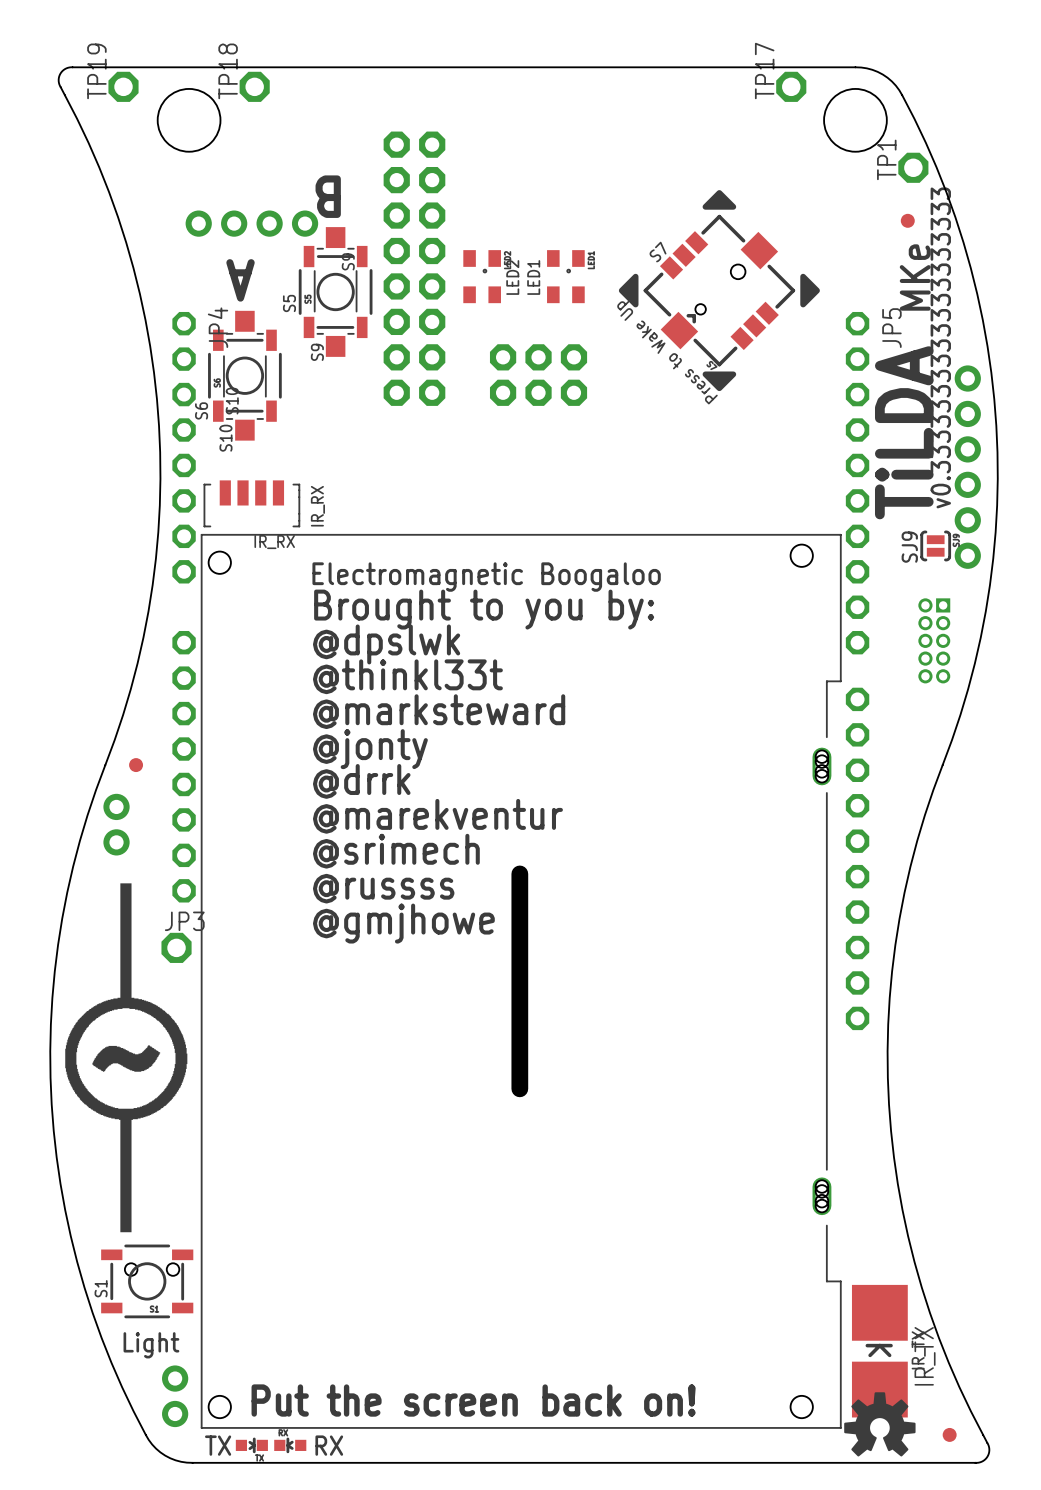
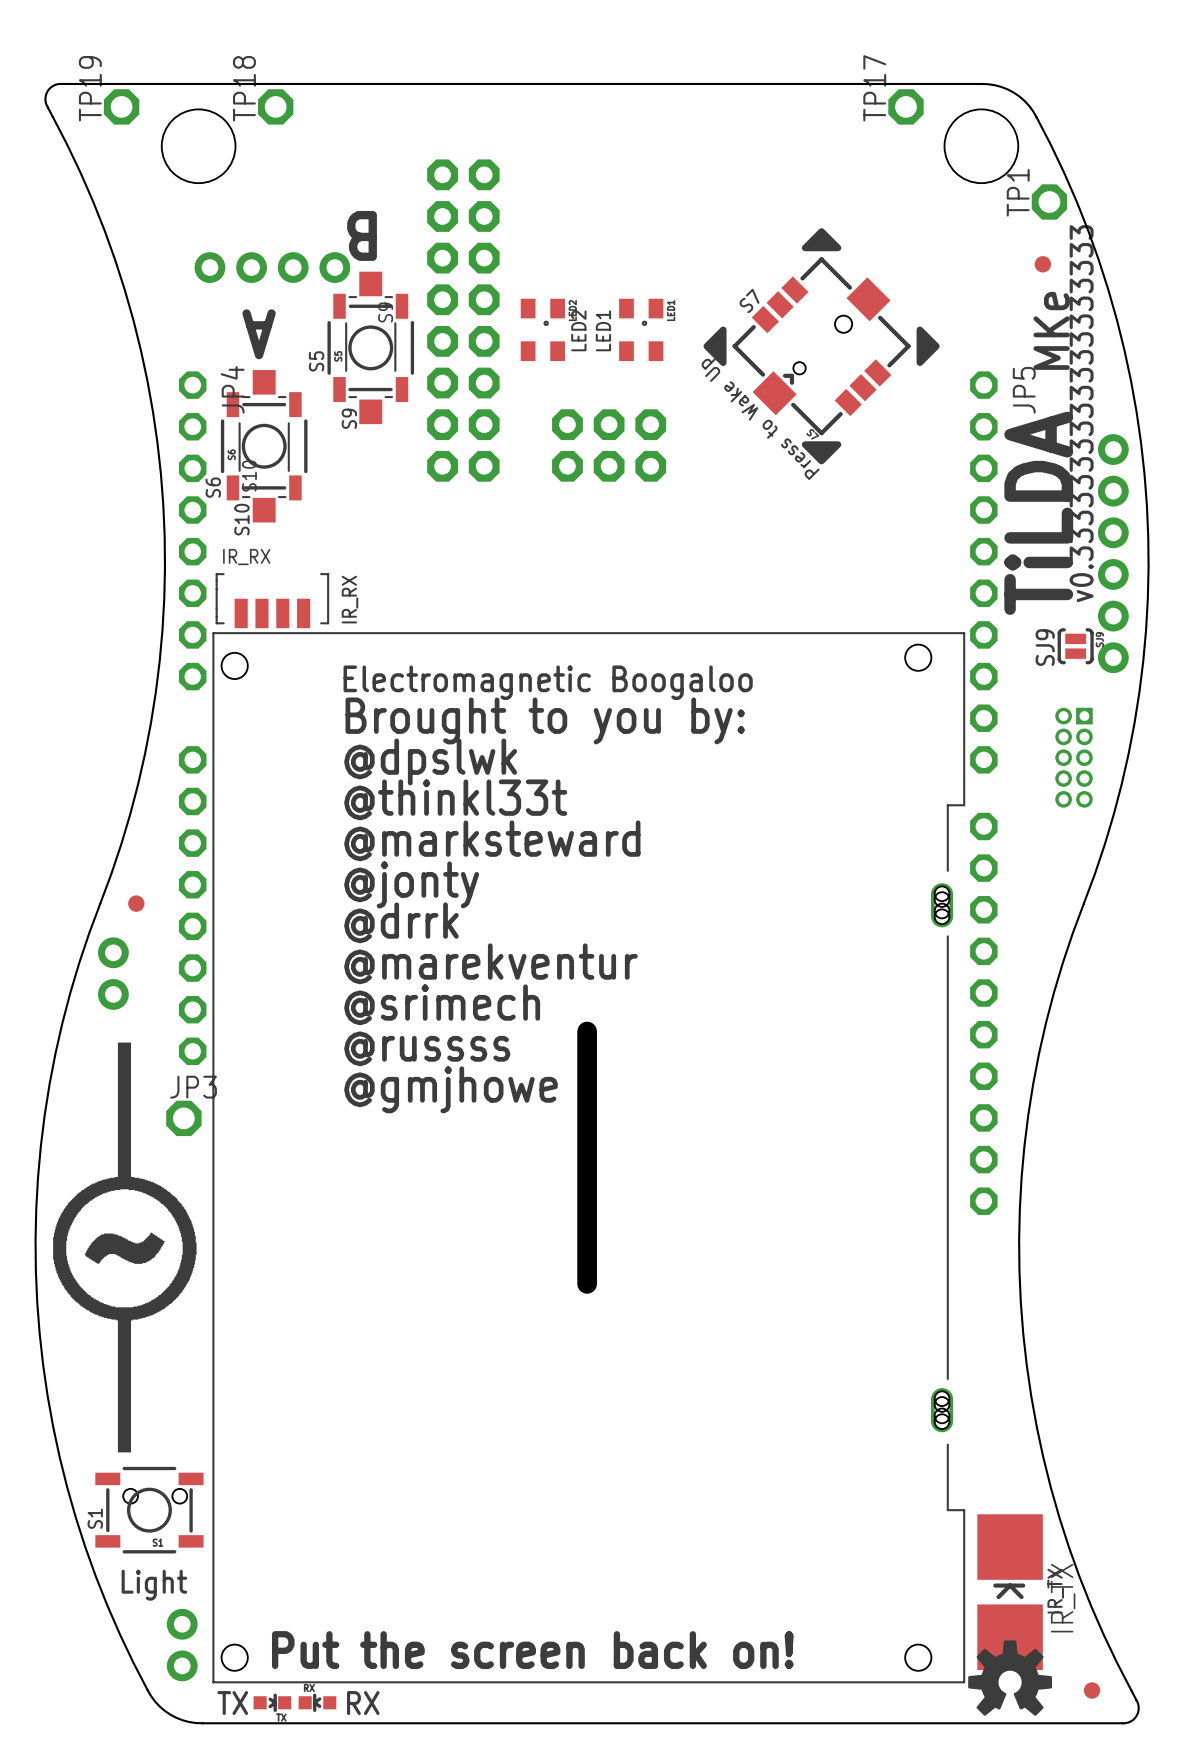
IR_RX rotation: 0° (251, 503) -> 180° (272, 600)

